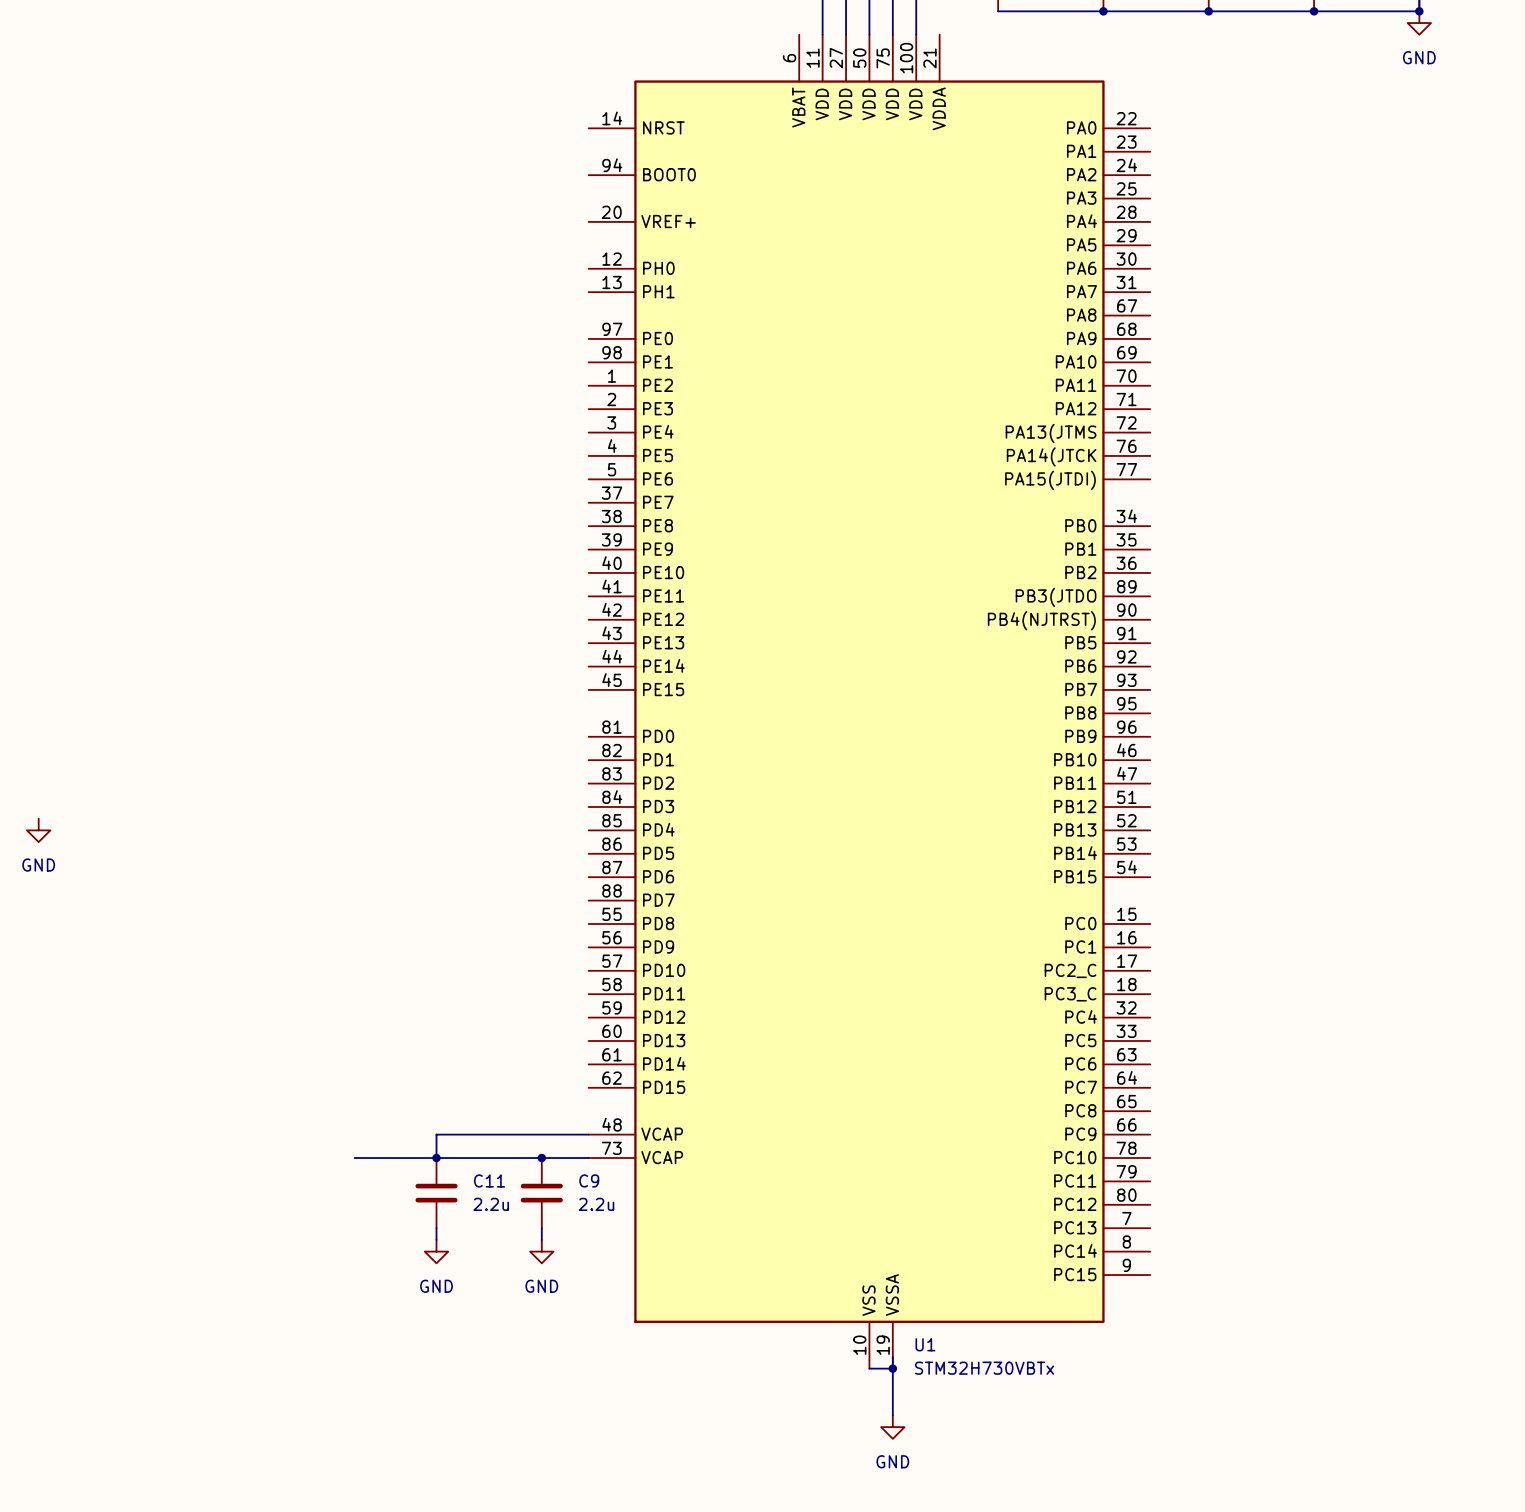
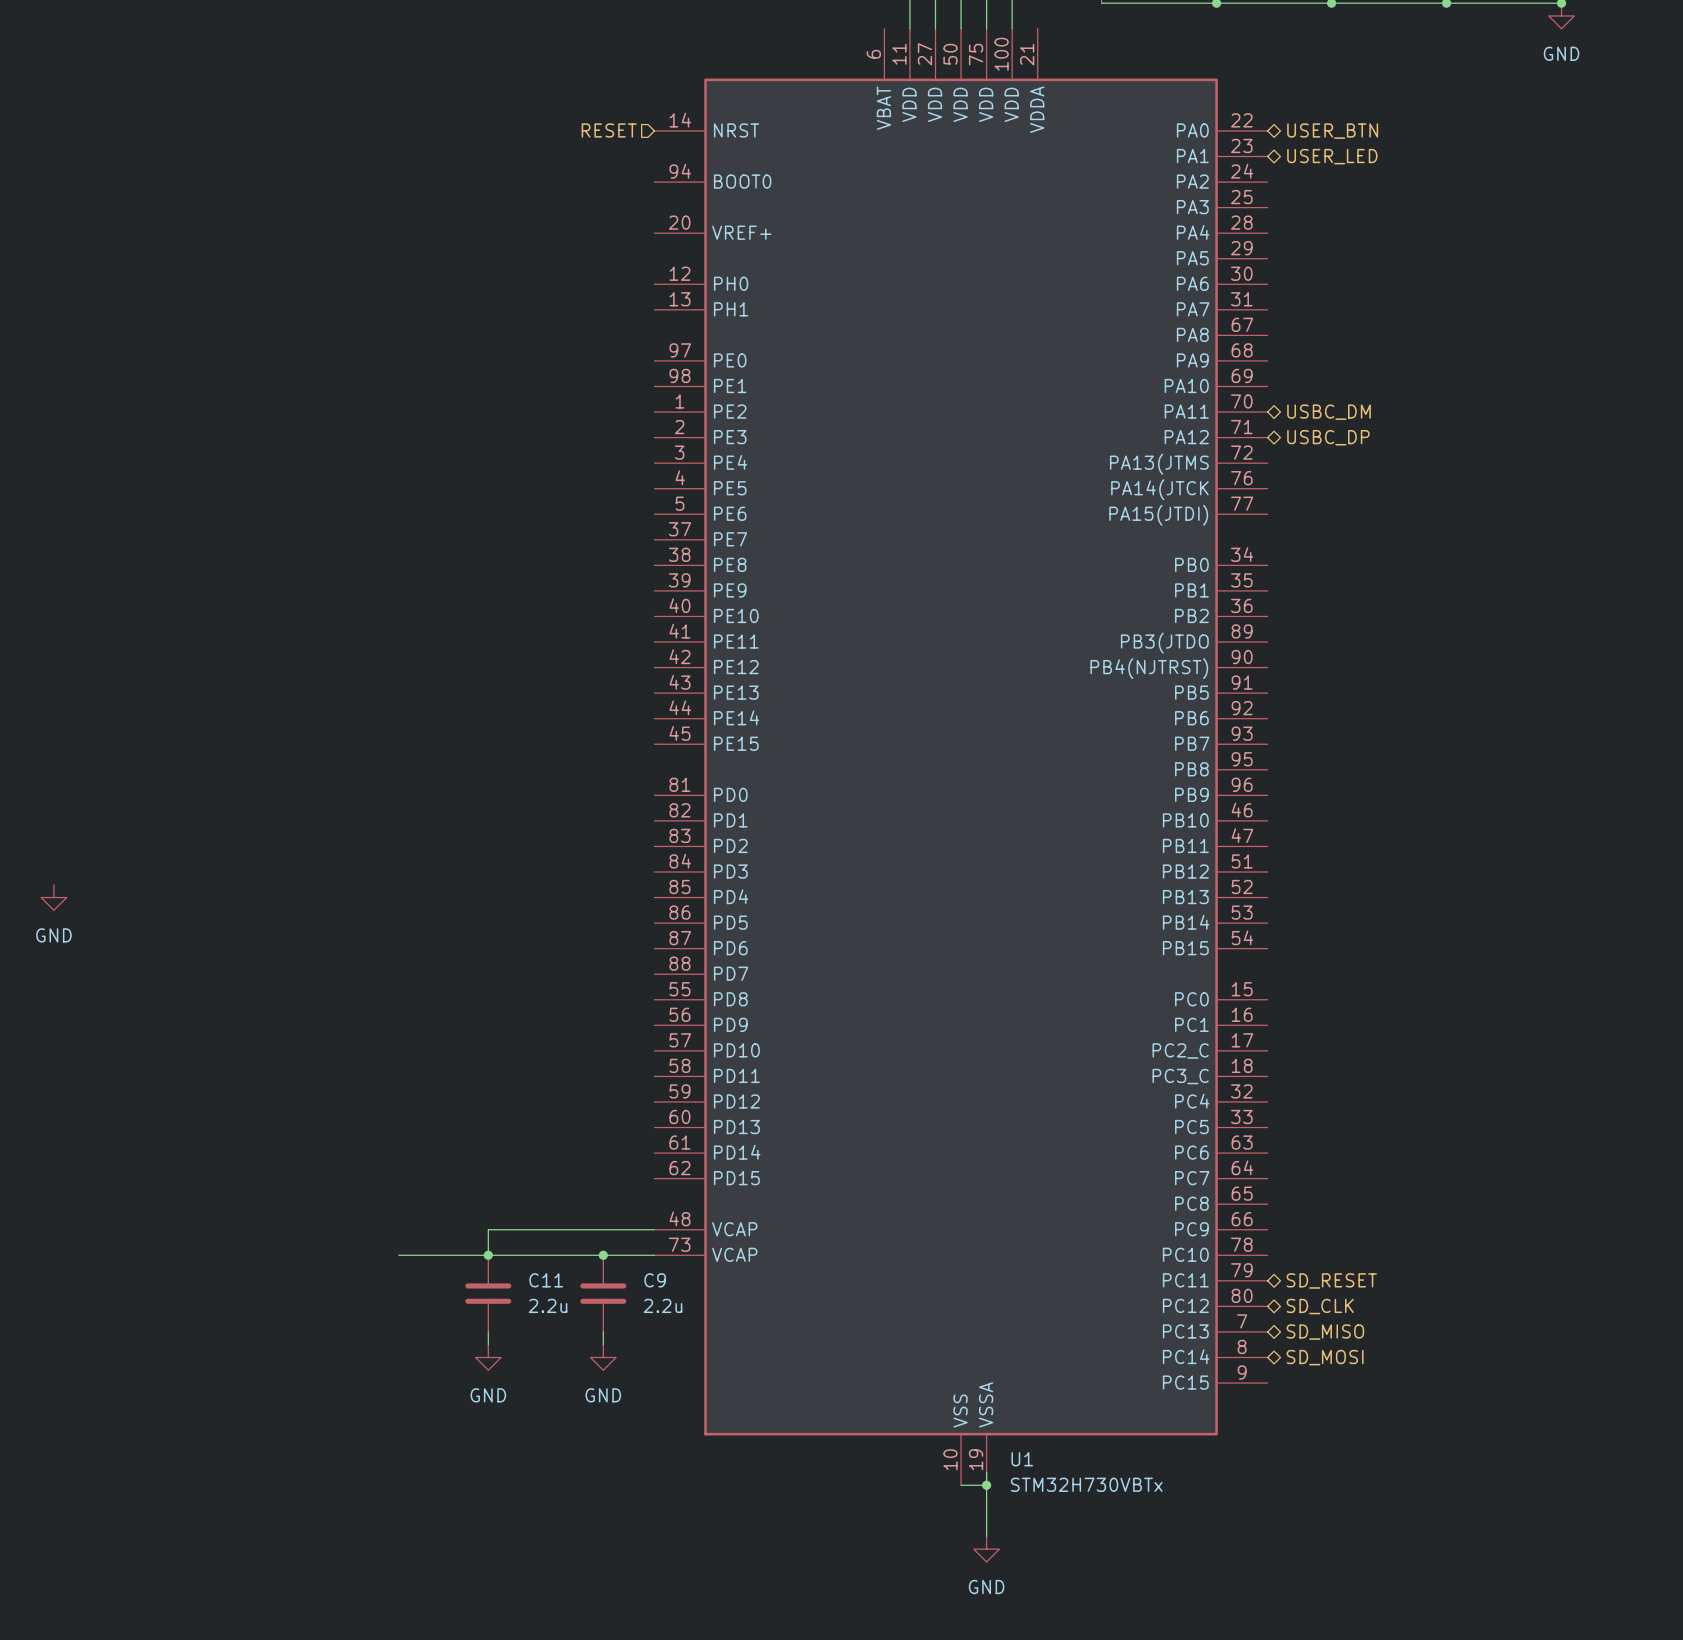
hierarchical label: none -> RESET (609, 130)
hierarchical label: none -> USER_BTN (1332, 131)
hierarchical label: none -> USER_LED (1332, 156)
hierarchical label: none -> USBC_DM (1329, 412)
hierarchical label: none -> USBC_DP (1328, 437)
hierarchical label: none -> SD_RESET (1331, 1280)
hierarchical label: none -> SD_CLK (1320, 1306)
hierarchical label: none -> SD_MISO (1325, 1332)
hierarchical label: none -> SD_MOSI (1325, 1357)

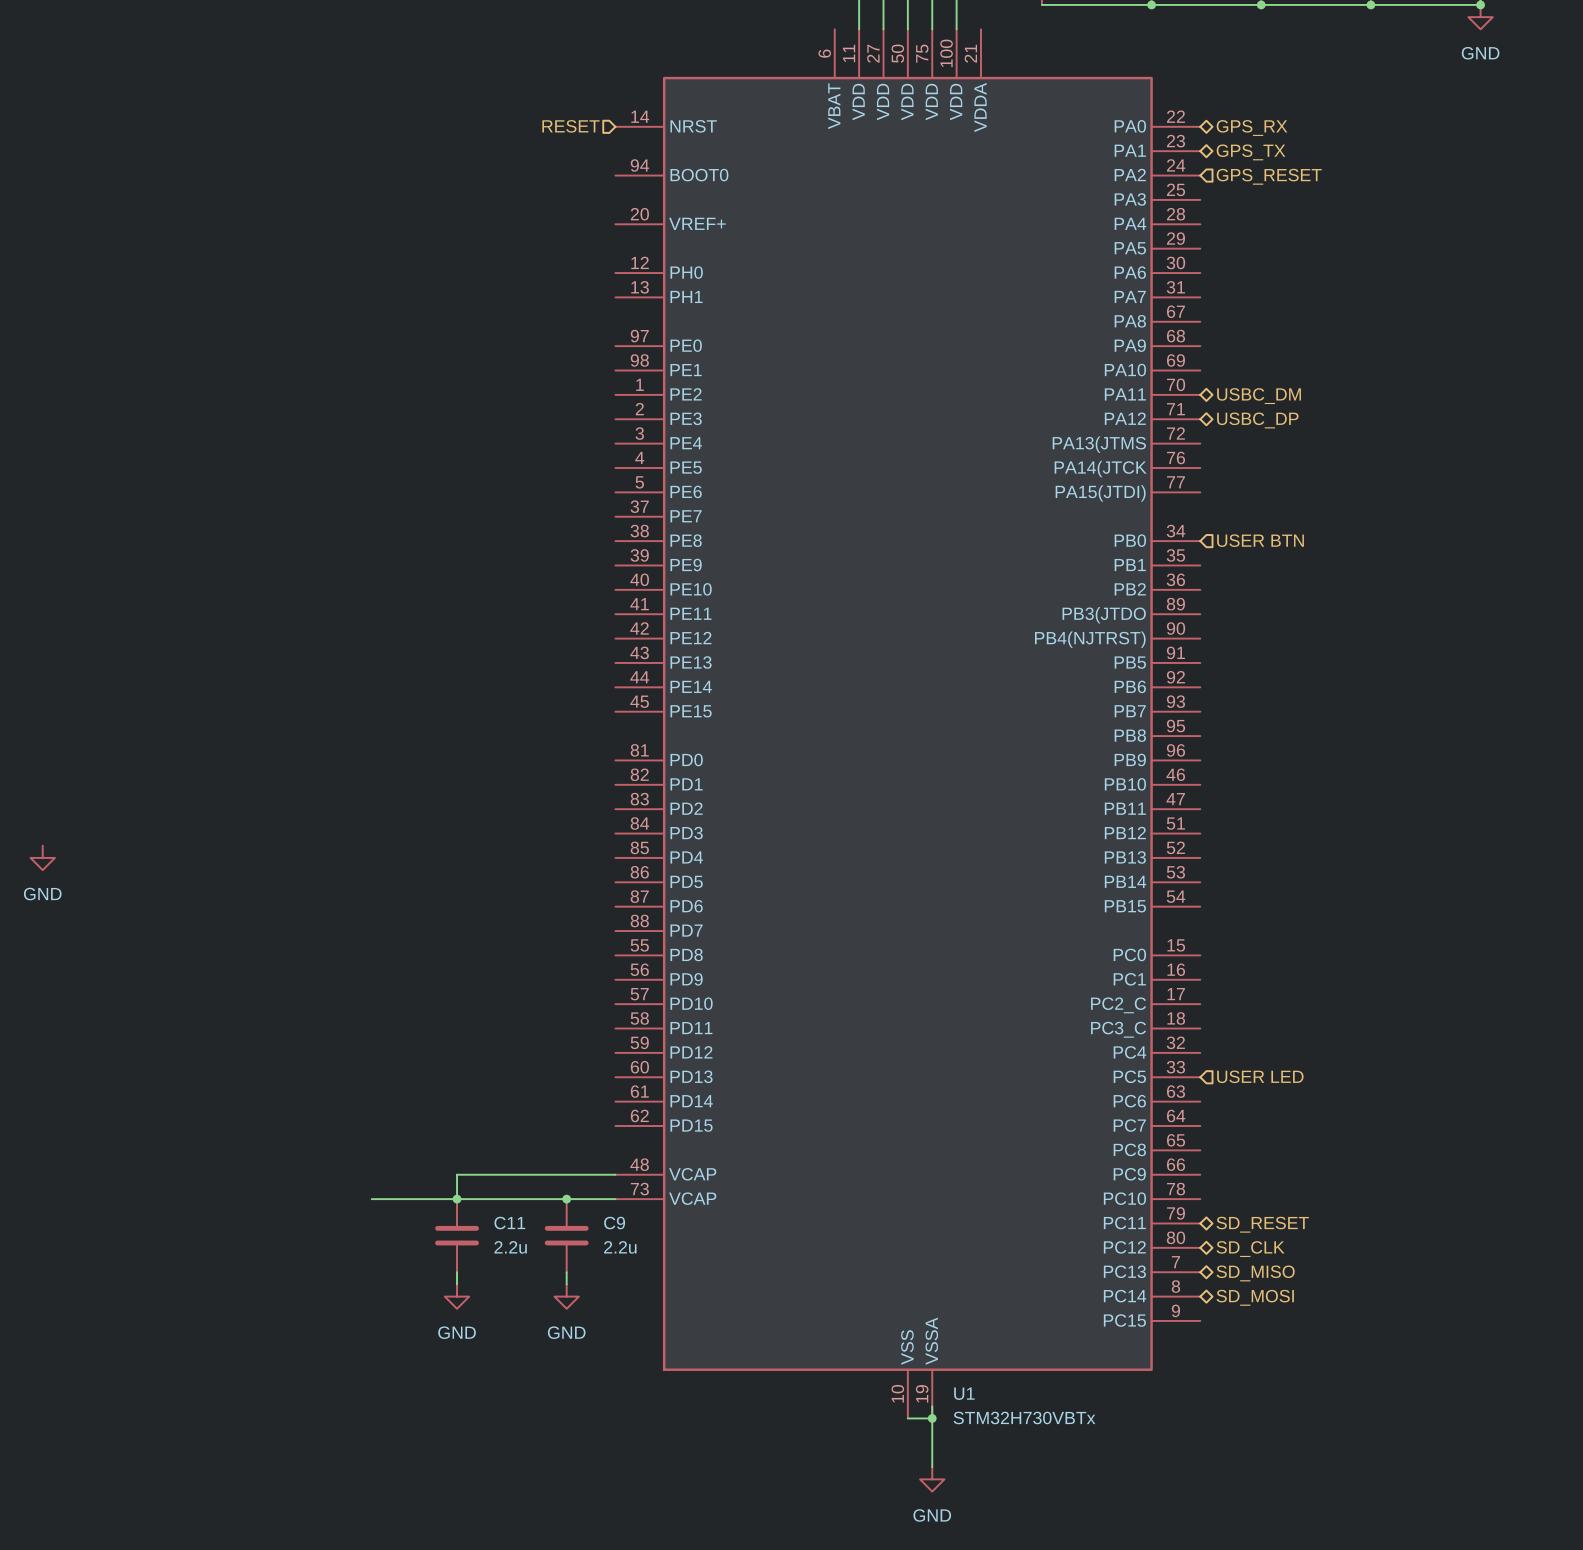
hierarchical label: USER_BTN (1332, 131) -> GPS_RX (1251, 128)
hierarchical label: USER_LED (1332, 156) -> GPS_TX (1251, 152)
hierarchical label: none -> GPS_RESET (1269, 176)
hierarchical label: none -> USER BTN (1260, 540)
hierarchical label: none -> USER LED (1260, 1076)

